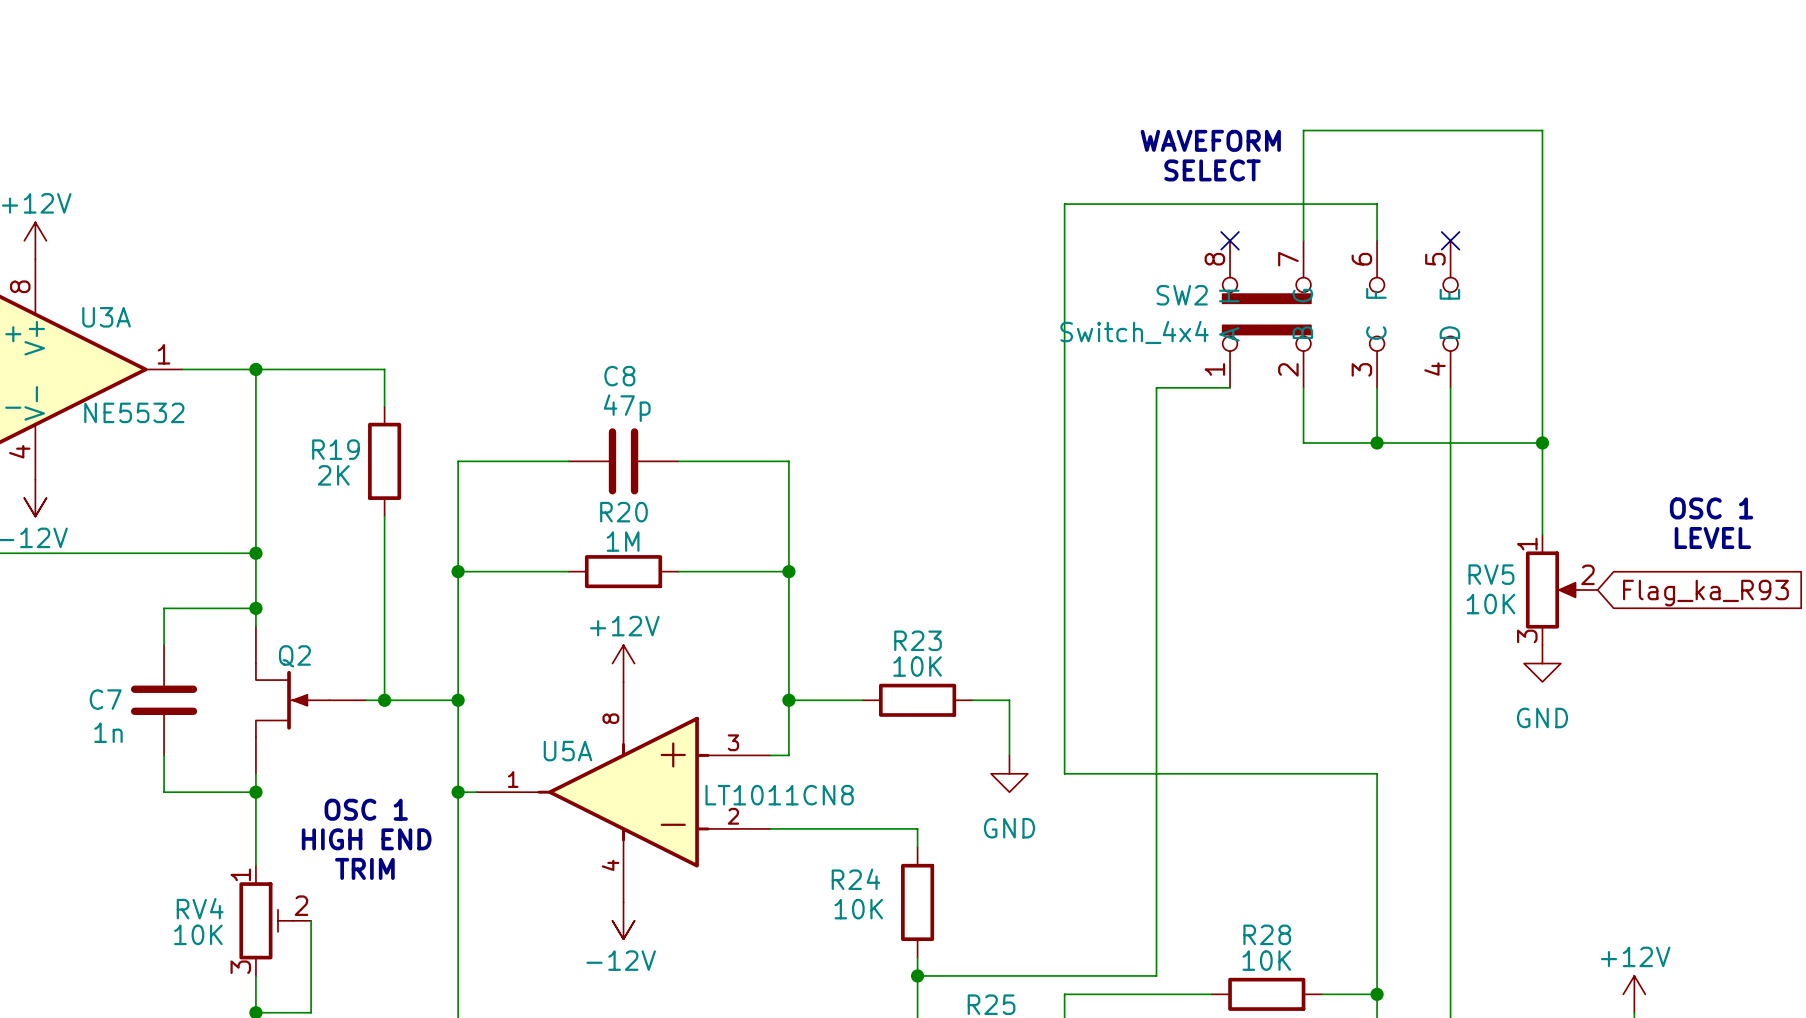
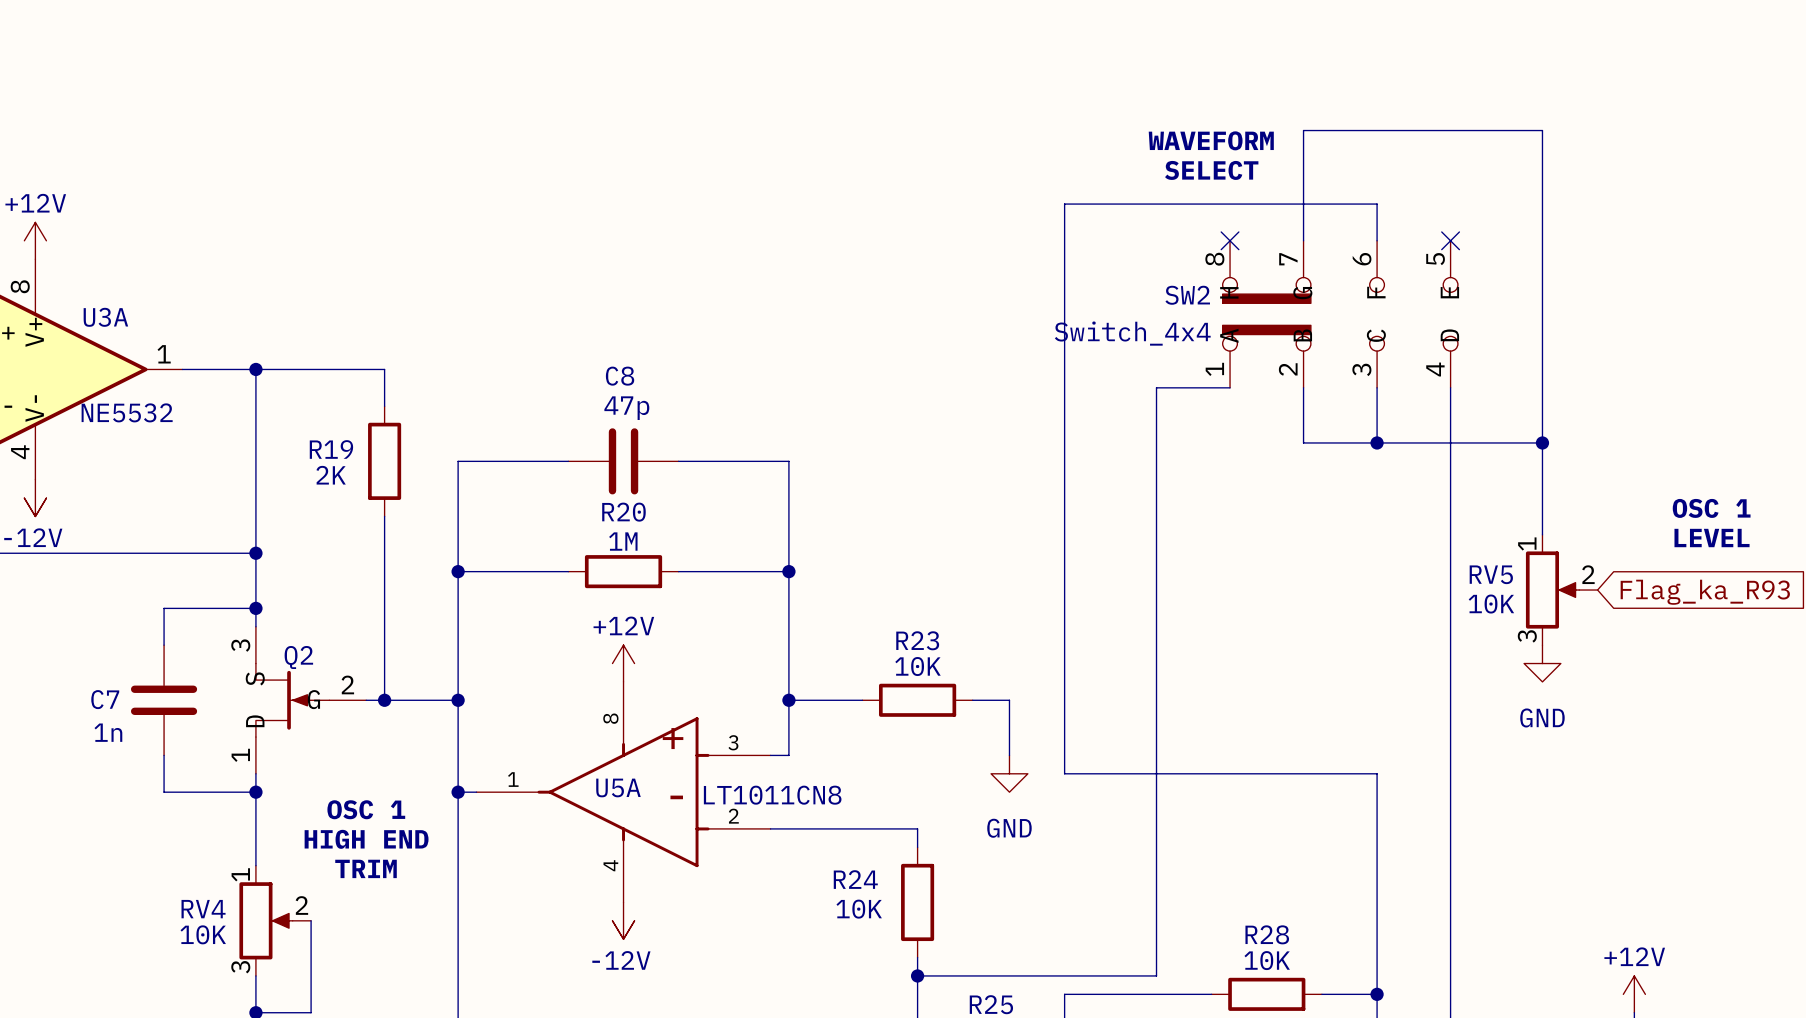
Q2 pin number: none -> 3 (240, 645)
Q2 pin name: none -> S (255, 678)
U5A symbol: [476, 681, 771, 903] -> [476, 681, 771, 903]
Q2 pin number: none -> 2 (347, 684)
Q2 pin name: none -> G (313, 699)
Q2 pin name: none -> D (255, 721)
U5A name position: U5A (568, 751) -> U5A (618, 787)
Q2 pin number: none -> 1 (240, 755)
RV4 symbol: [239, 865, 312, 976] -> [239, 865, 312, 976]

